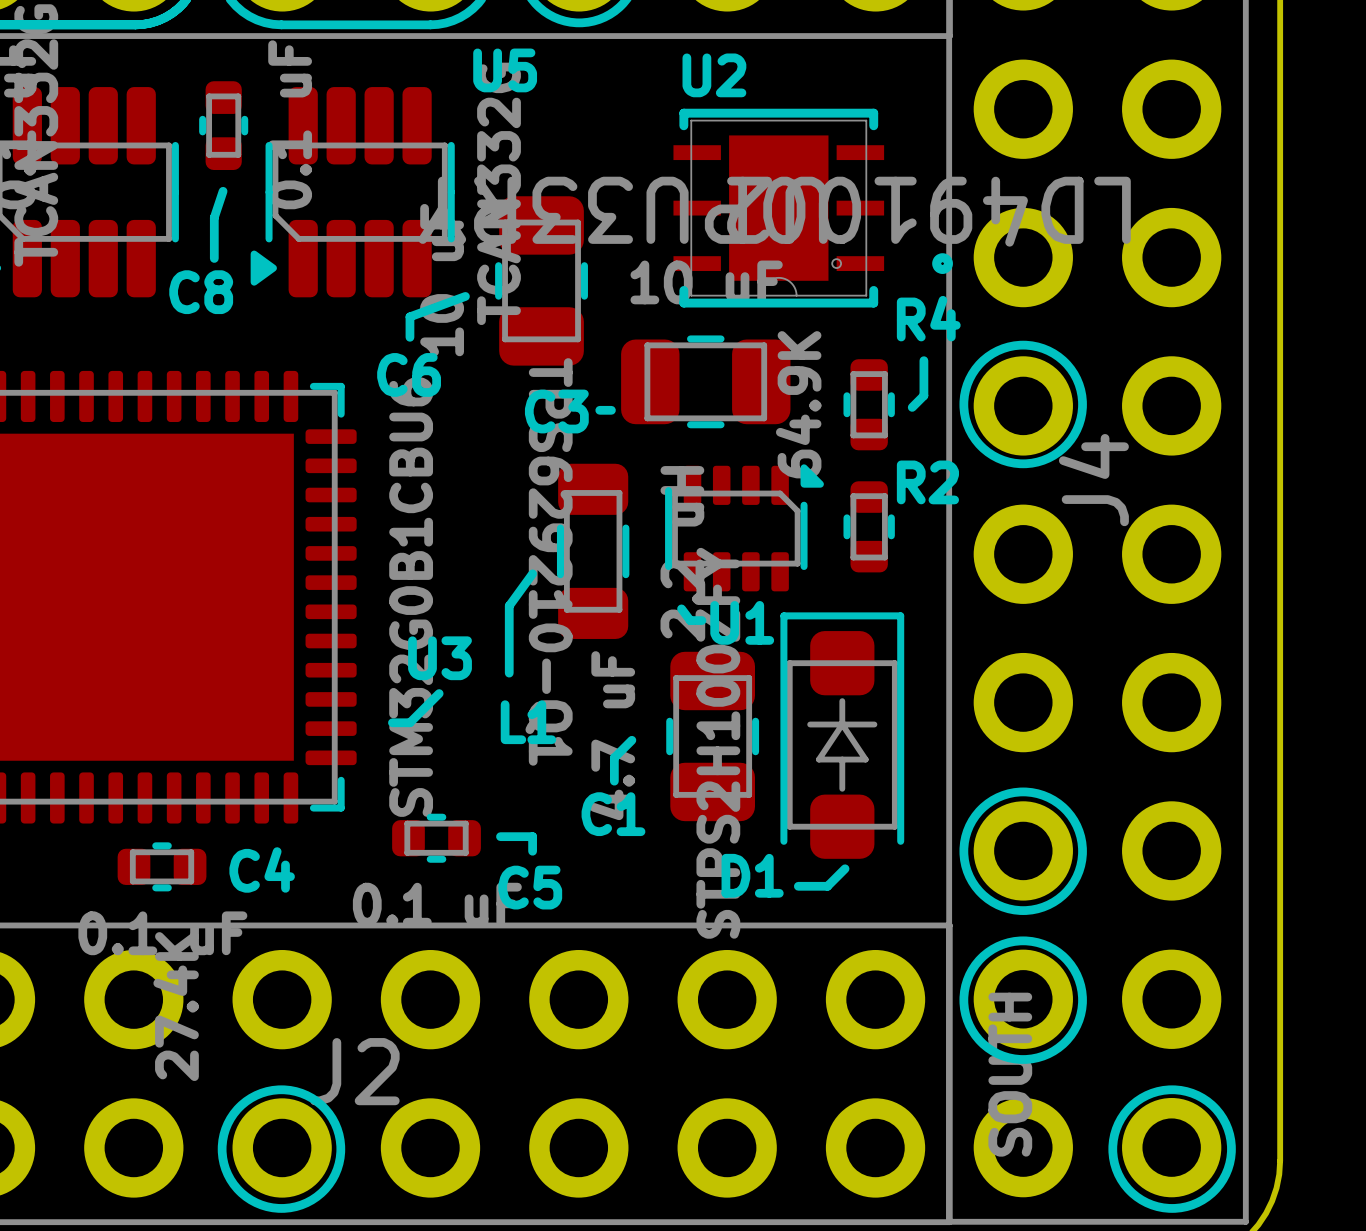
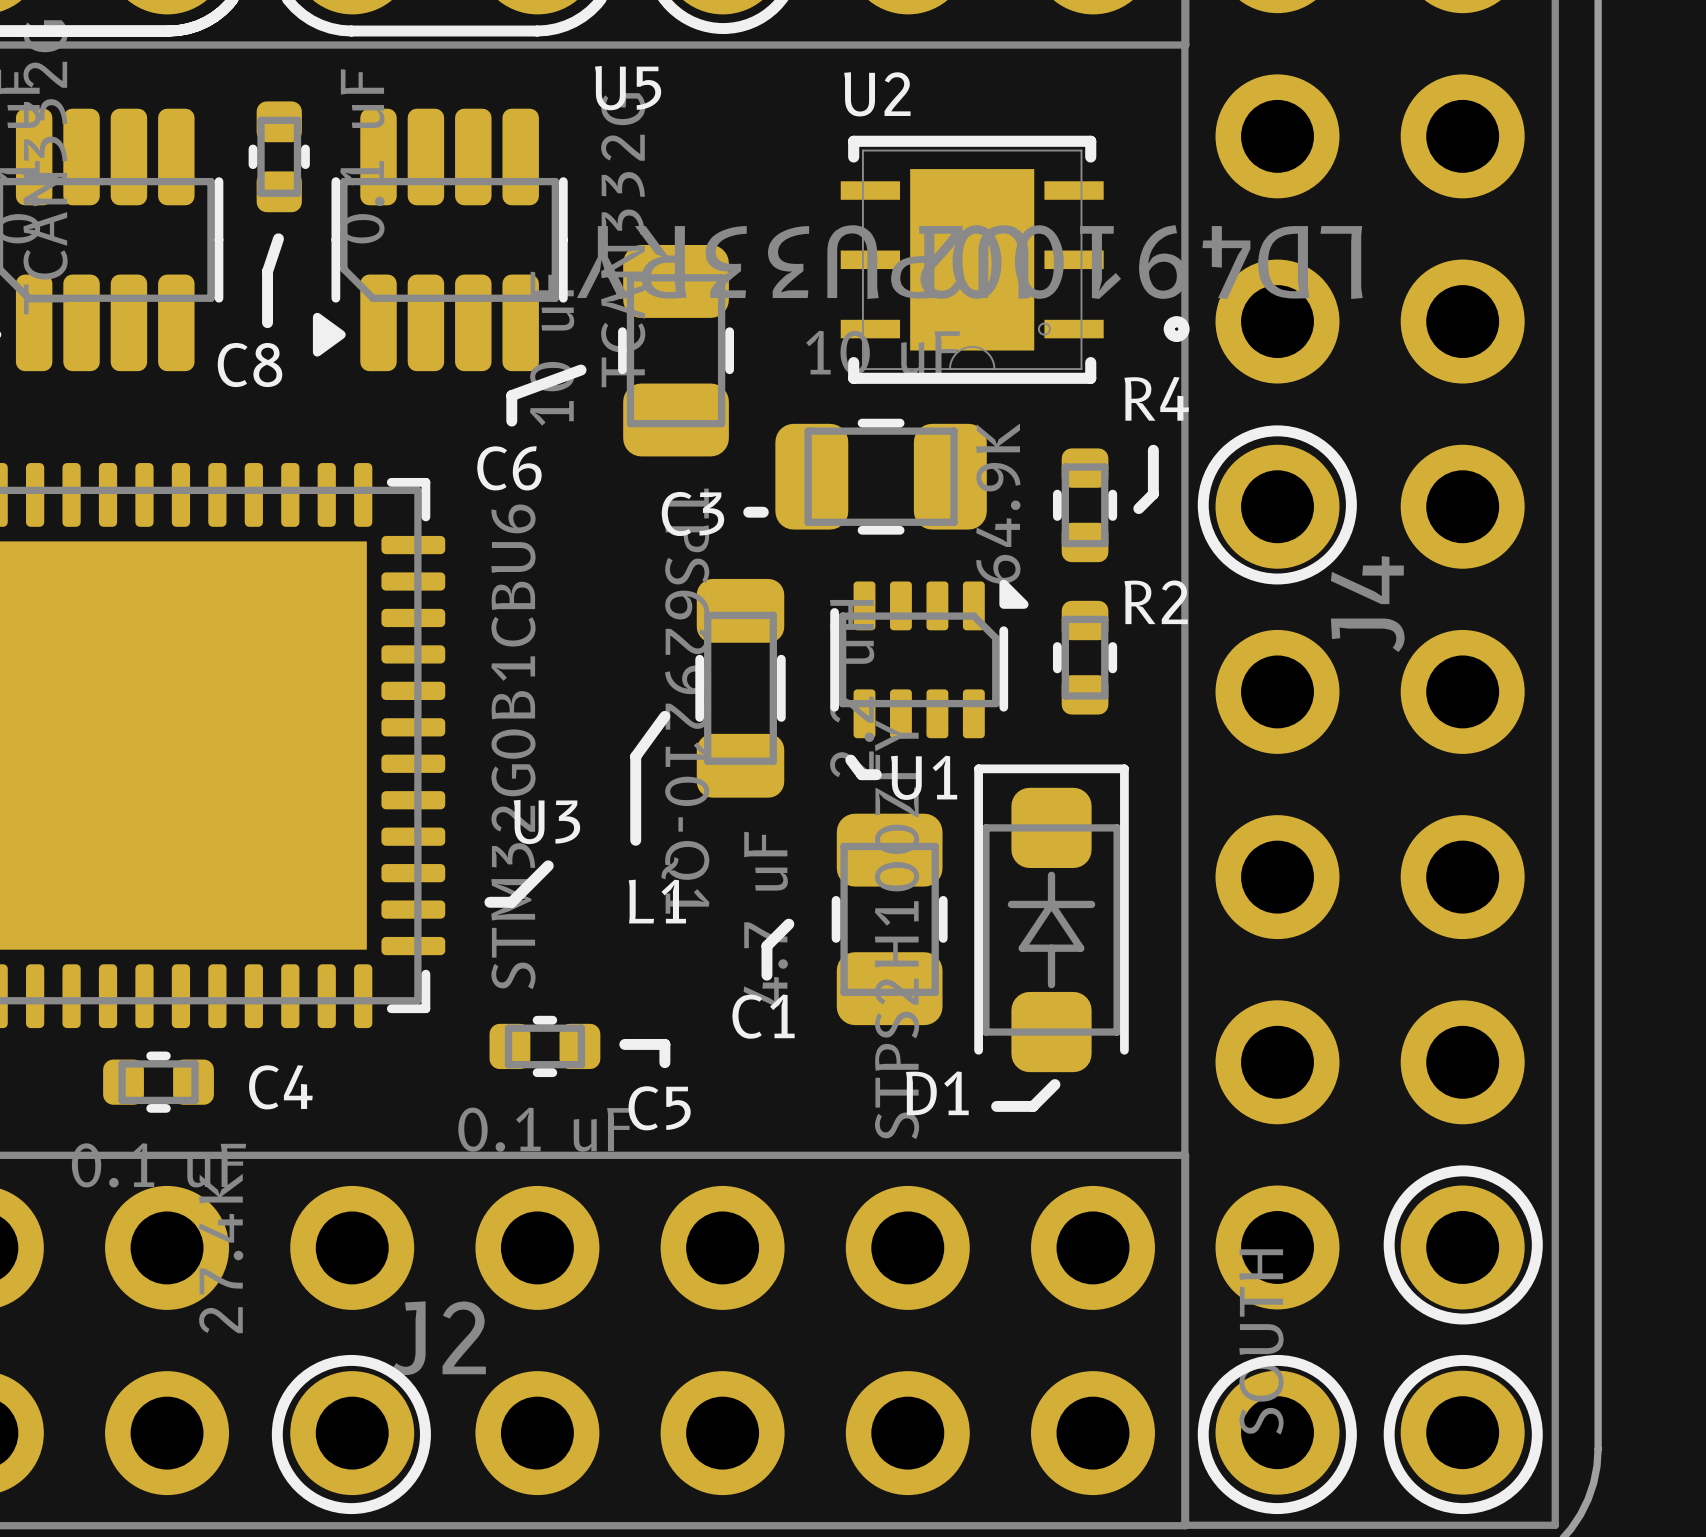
drawing: [959, 787, 1087, 1064] -> none
C4 position: (162, 866) -> (158, 1082)
drawing: none -> [1197, 1165, 1543, 1515]

